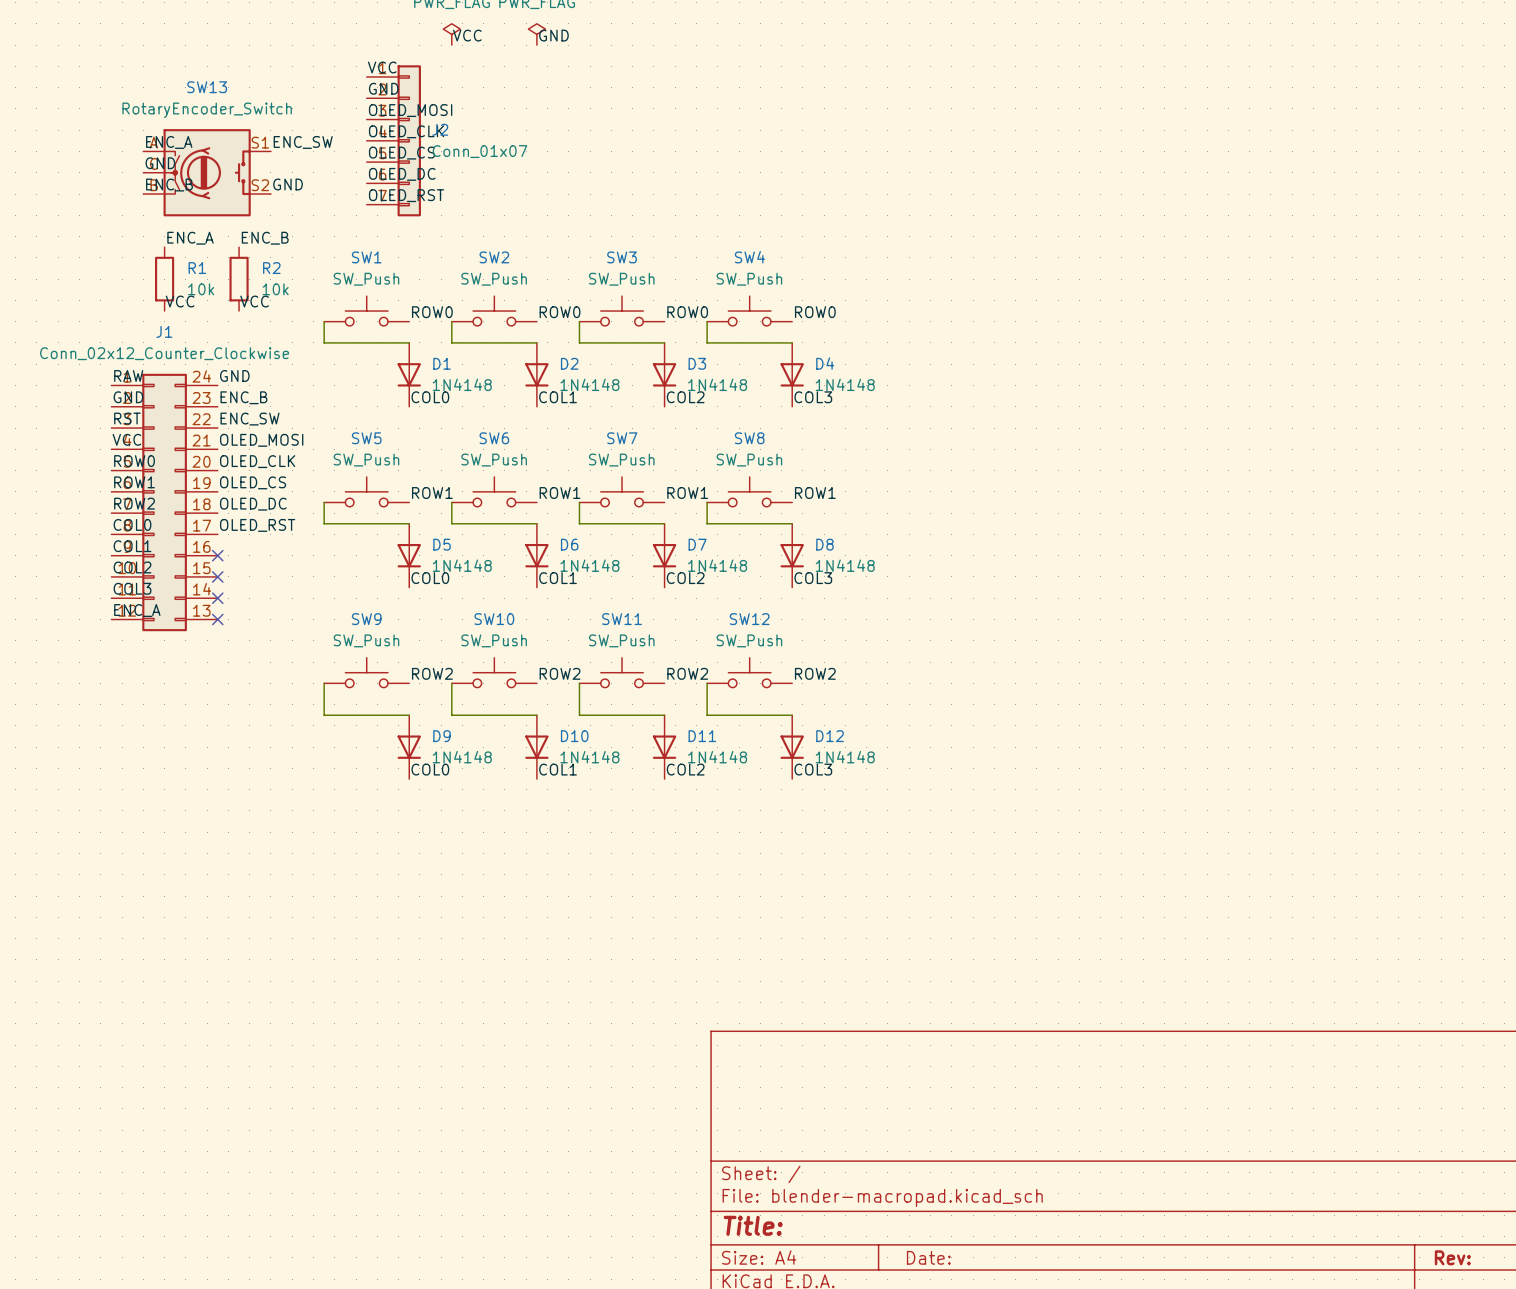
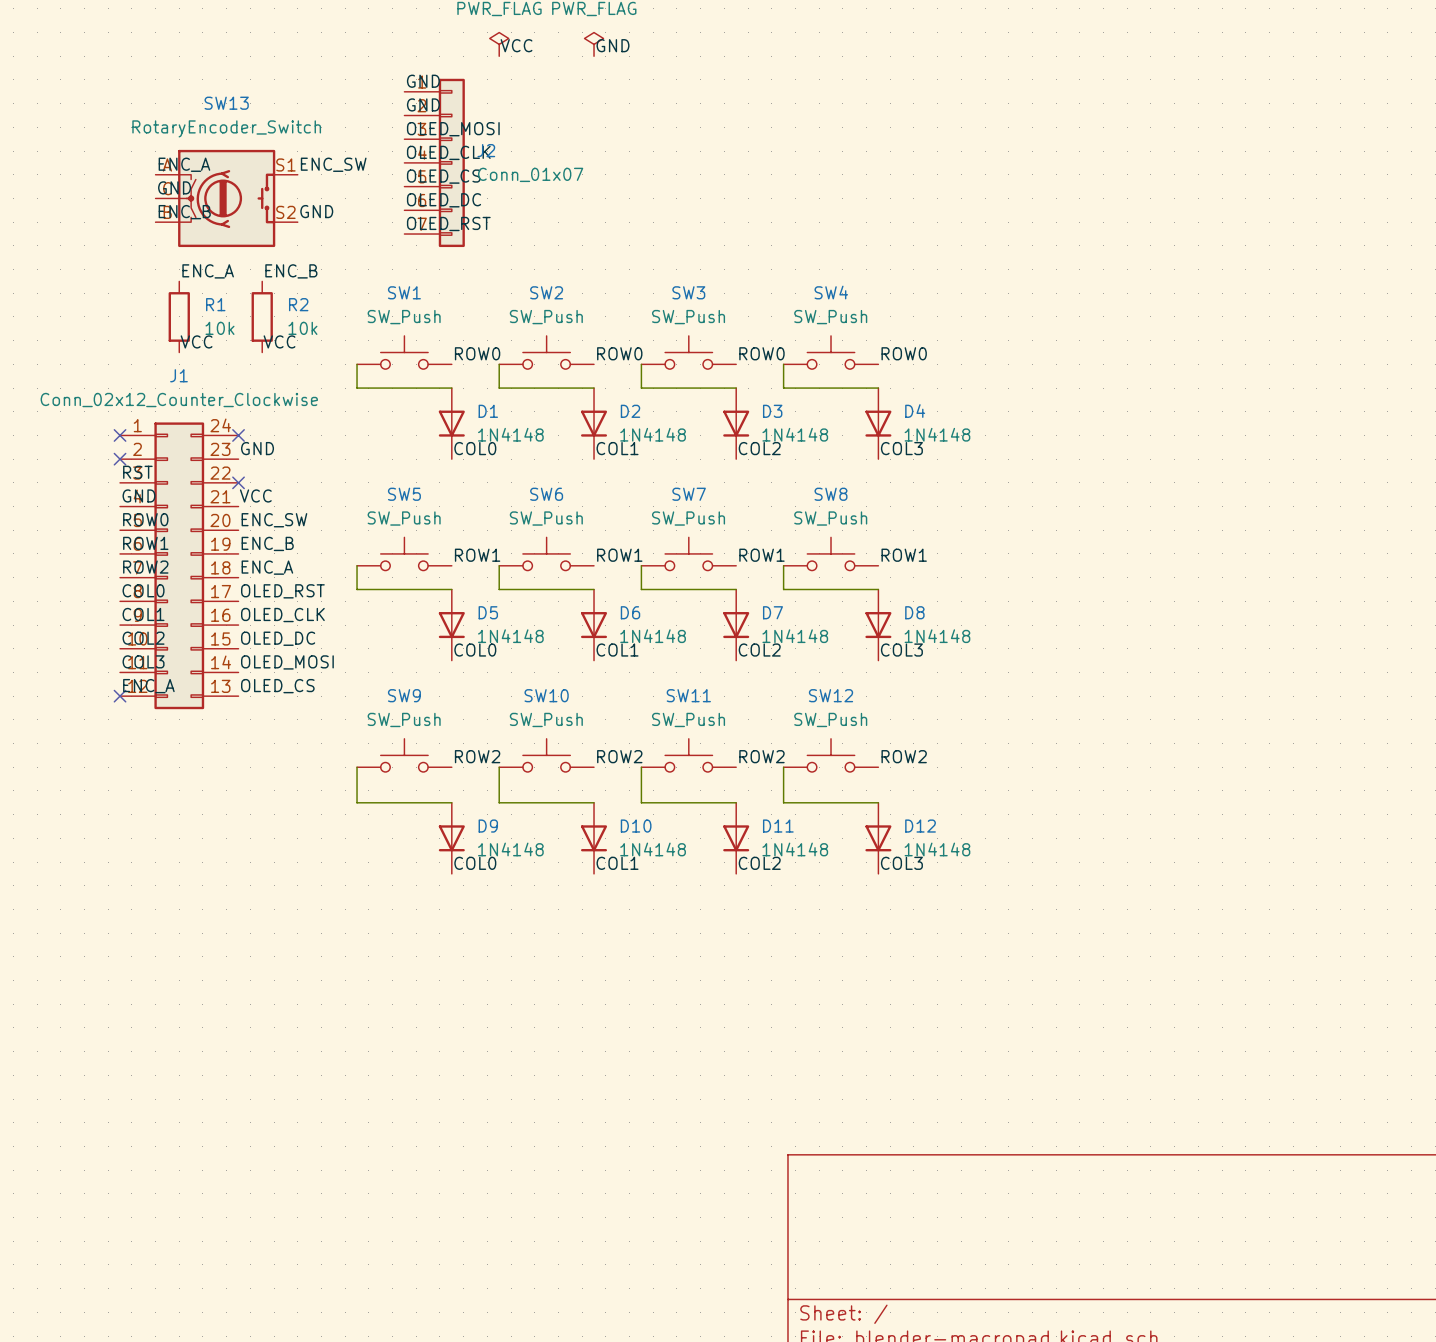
label: VCC (382, 67) -> GND (423, 81)
label: RAW (128, 375) -> none
label: GND (234, 375) -> none
no-connect mark: none -> (120, 435)
no-connect mark: none -> (238, 435)
label: GND (128, 397) -> none
label: ENC_B (243, 397) -> GND (257, 448)
no-connect mark: none -> (120, 459)
label: ENC_SW (250, 419) -> none
no-connect mark: none -> (238, 482)
label: VCC (126, 439) -> GND (139, 495)
label: OLED_MOSI (261, 440) -> VCC (255, 495)
label: OLED_CLK (257, 461) -> ENC_SW (274, 520)
label: OLED_CS (253, 482) -> ENC_B (267, 543)
label: OLED_DC (253, 504) -> ENC_A (267, 567)
label: none -> OLED_CLK (282, 615)
no-connect mark: (217, 555) -> none
label: none -> OLED_DC (278, 638)
no-connect mark: (217, 576) -> none
label: none -> OLED_MOSI (287, 662)
no-connect mark: (217, 598) -> none
label: none -> OLED_CS (277, 686)
no-connect mark: none -> (120, 696)
no-connect mark: (217, 619) -> none

